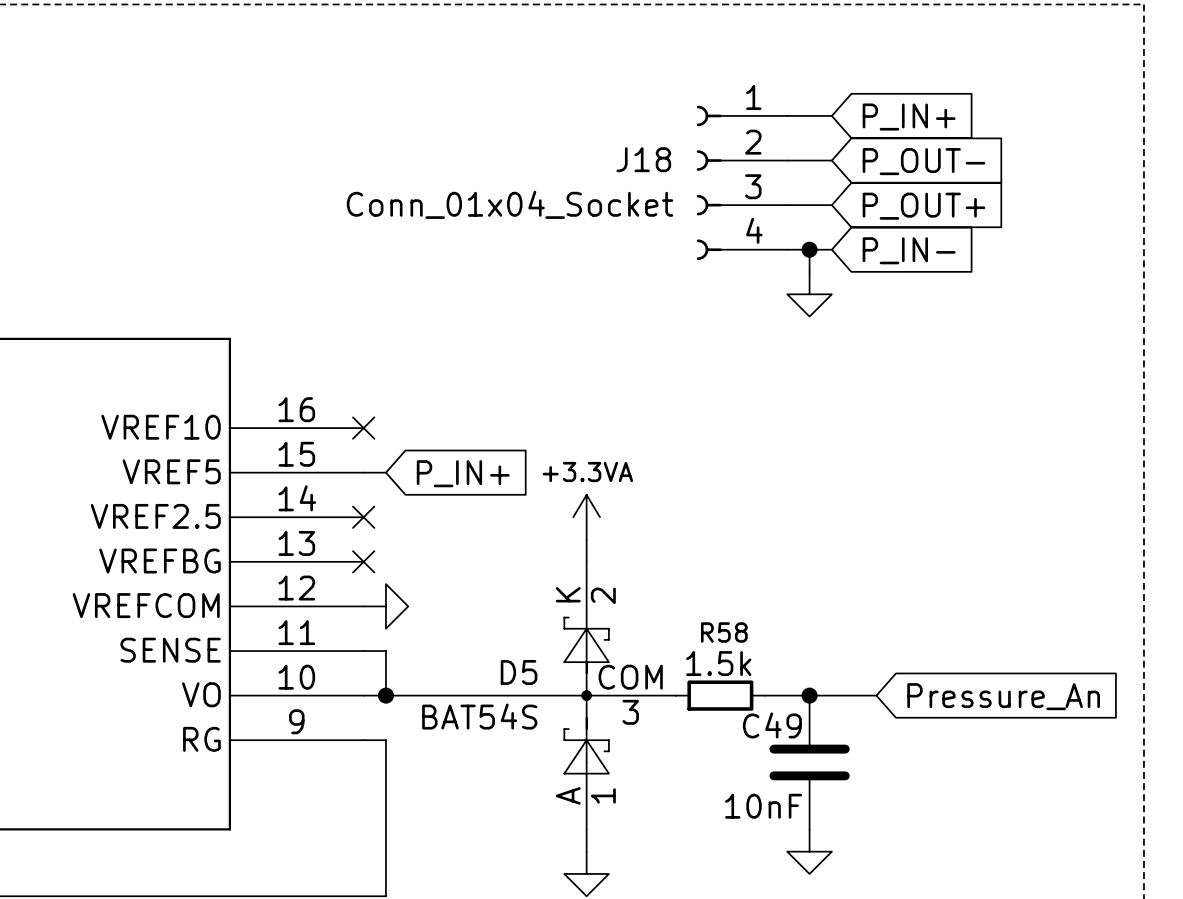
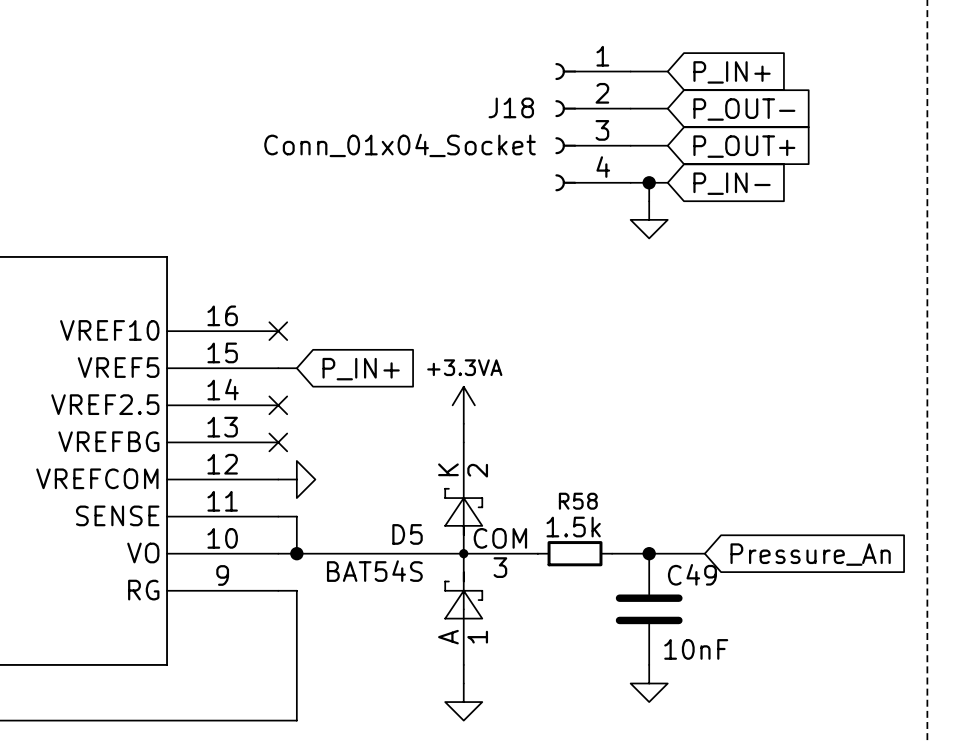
C49 name position: C49 (772, 725) -> C49 (692, 574)
C49 value position: 10nF (763, 806) -> 10nF (696, 649)

